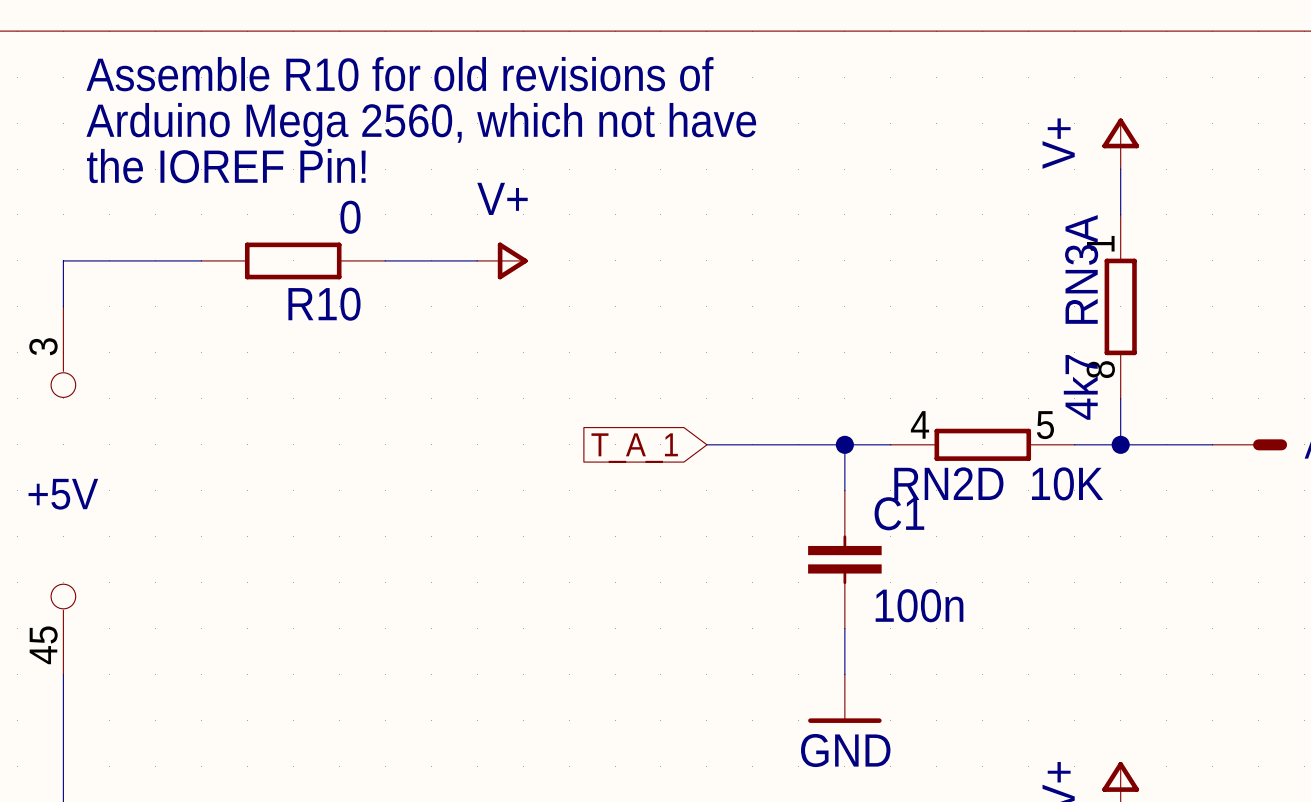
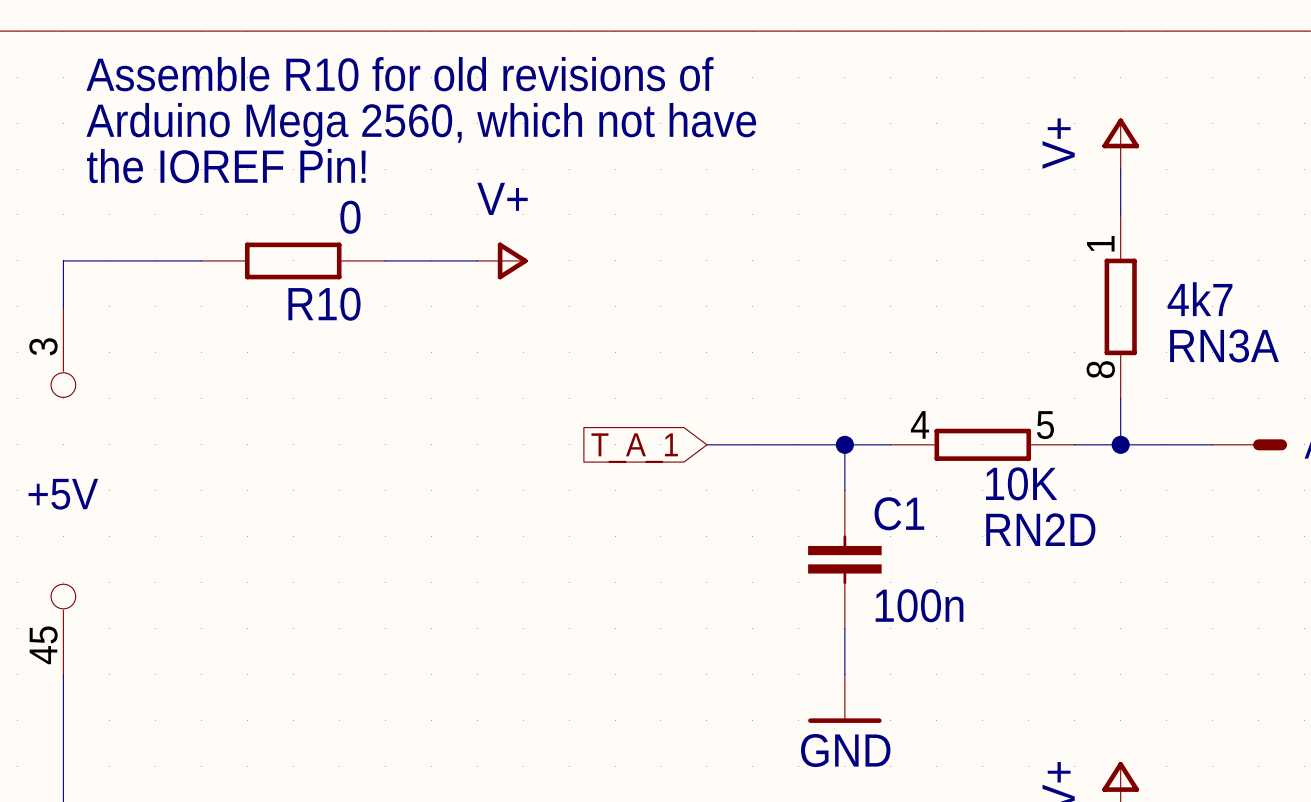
RN3A name rotation: 0° (1081, 269) -> 90° clockwise (1224, 345)
RN3A name position: RN3A (1081, 269) -> RN3A (1224, 345)
RN3A value rotation: 0° (1080, 387) -> 90° clockwise (1200, 299)
RN3A value position: 4k7 (1080, 387) -> 4k7 (1200, 299)
RN2D name position: RN2D (948, 483) -> RN2D (1040, 529)
RN2D value position: 10K (1067, 483) -> 10K (1021, 483)

